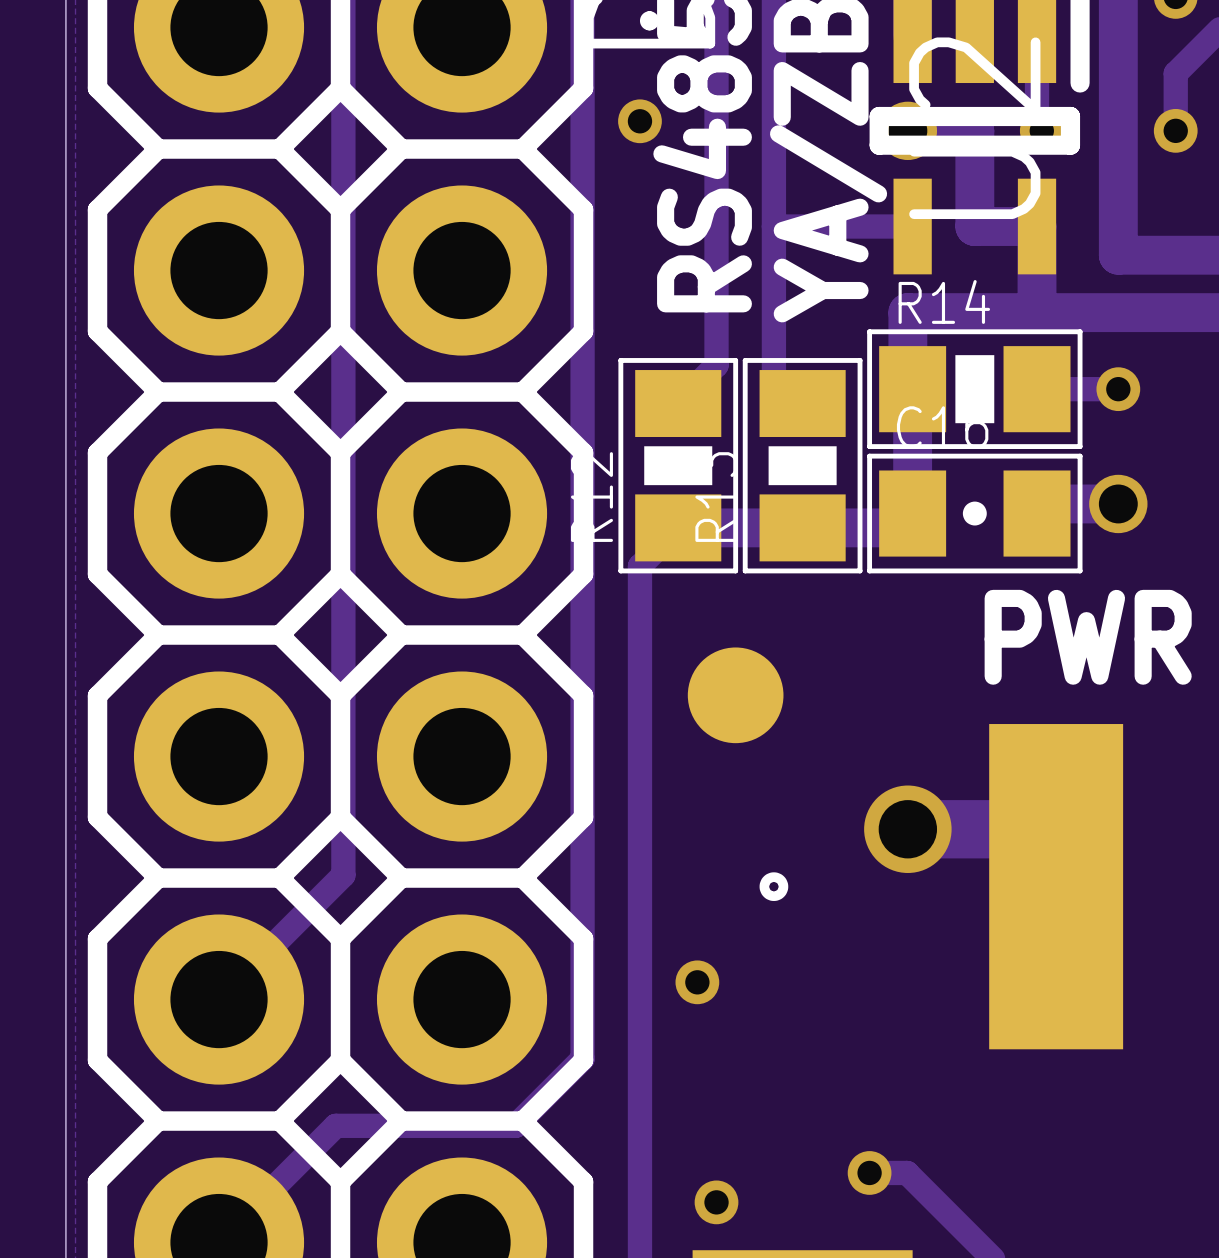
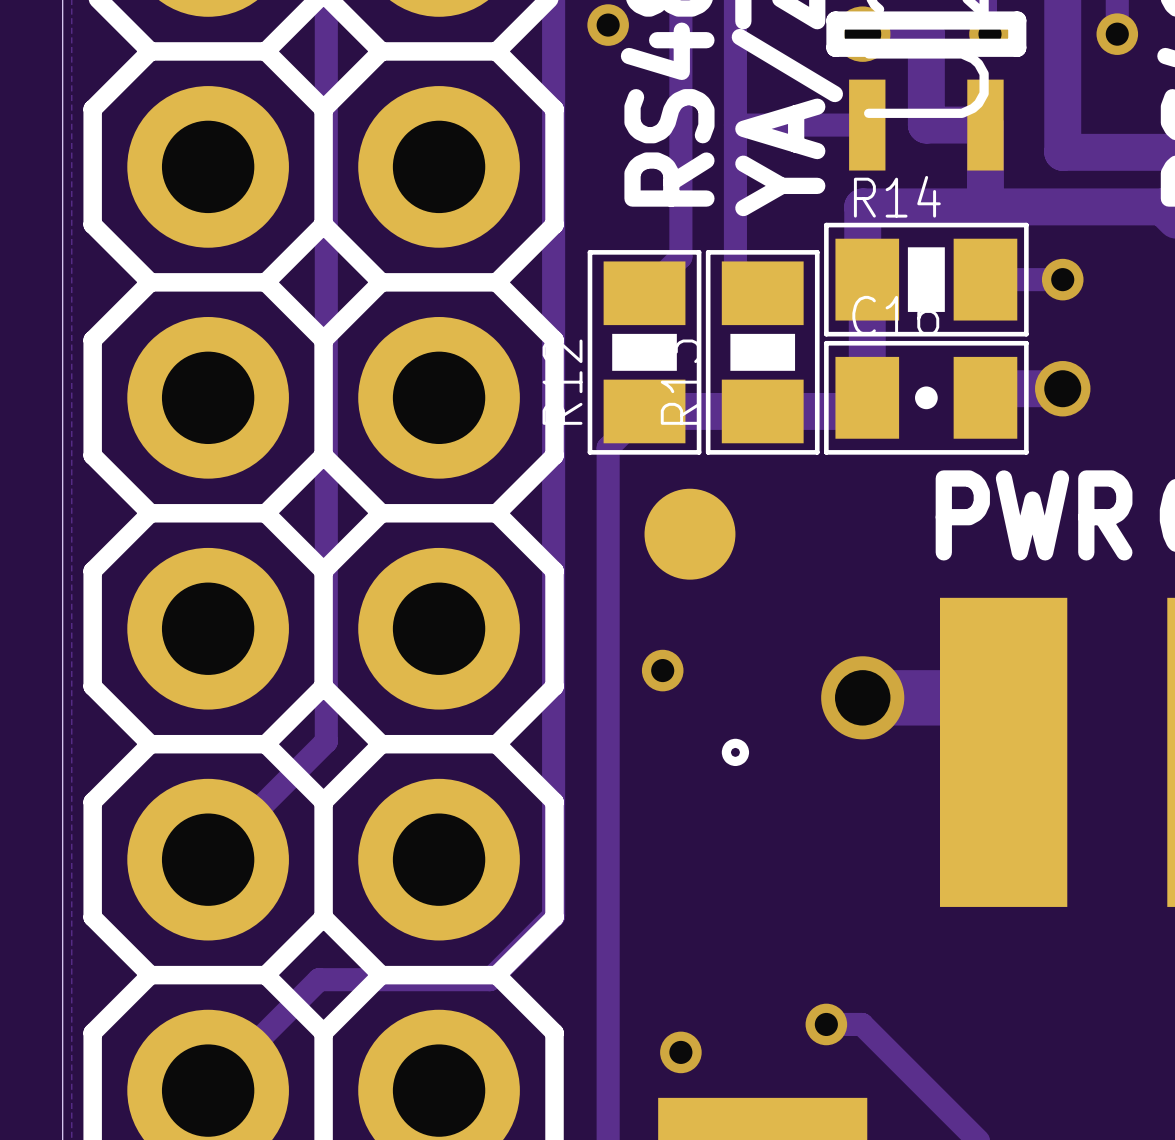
part position: (735, 695) -> (689, 534)
via position: (697, 982) -> (662, 670)

